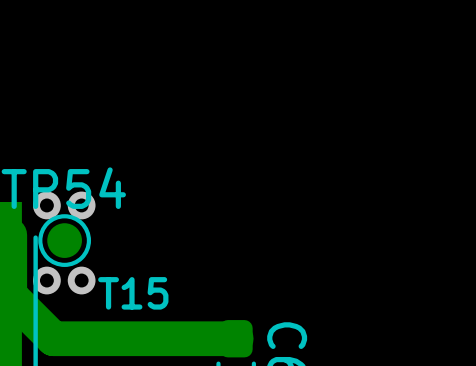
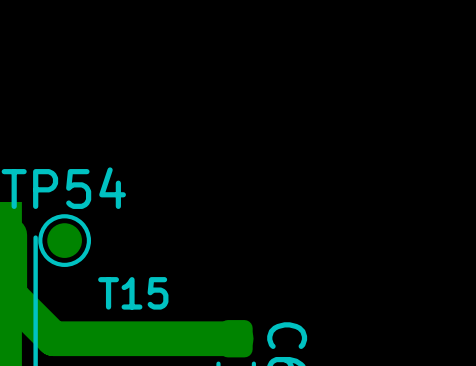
via: (46, 205) -> none
via: (81, 205) -> none
via: (46, 280) -> none
via: (81, 280) -> none

